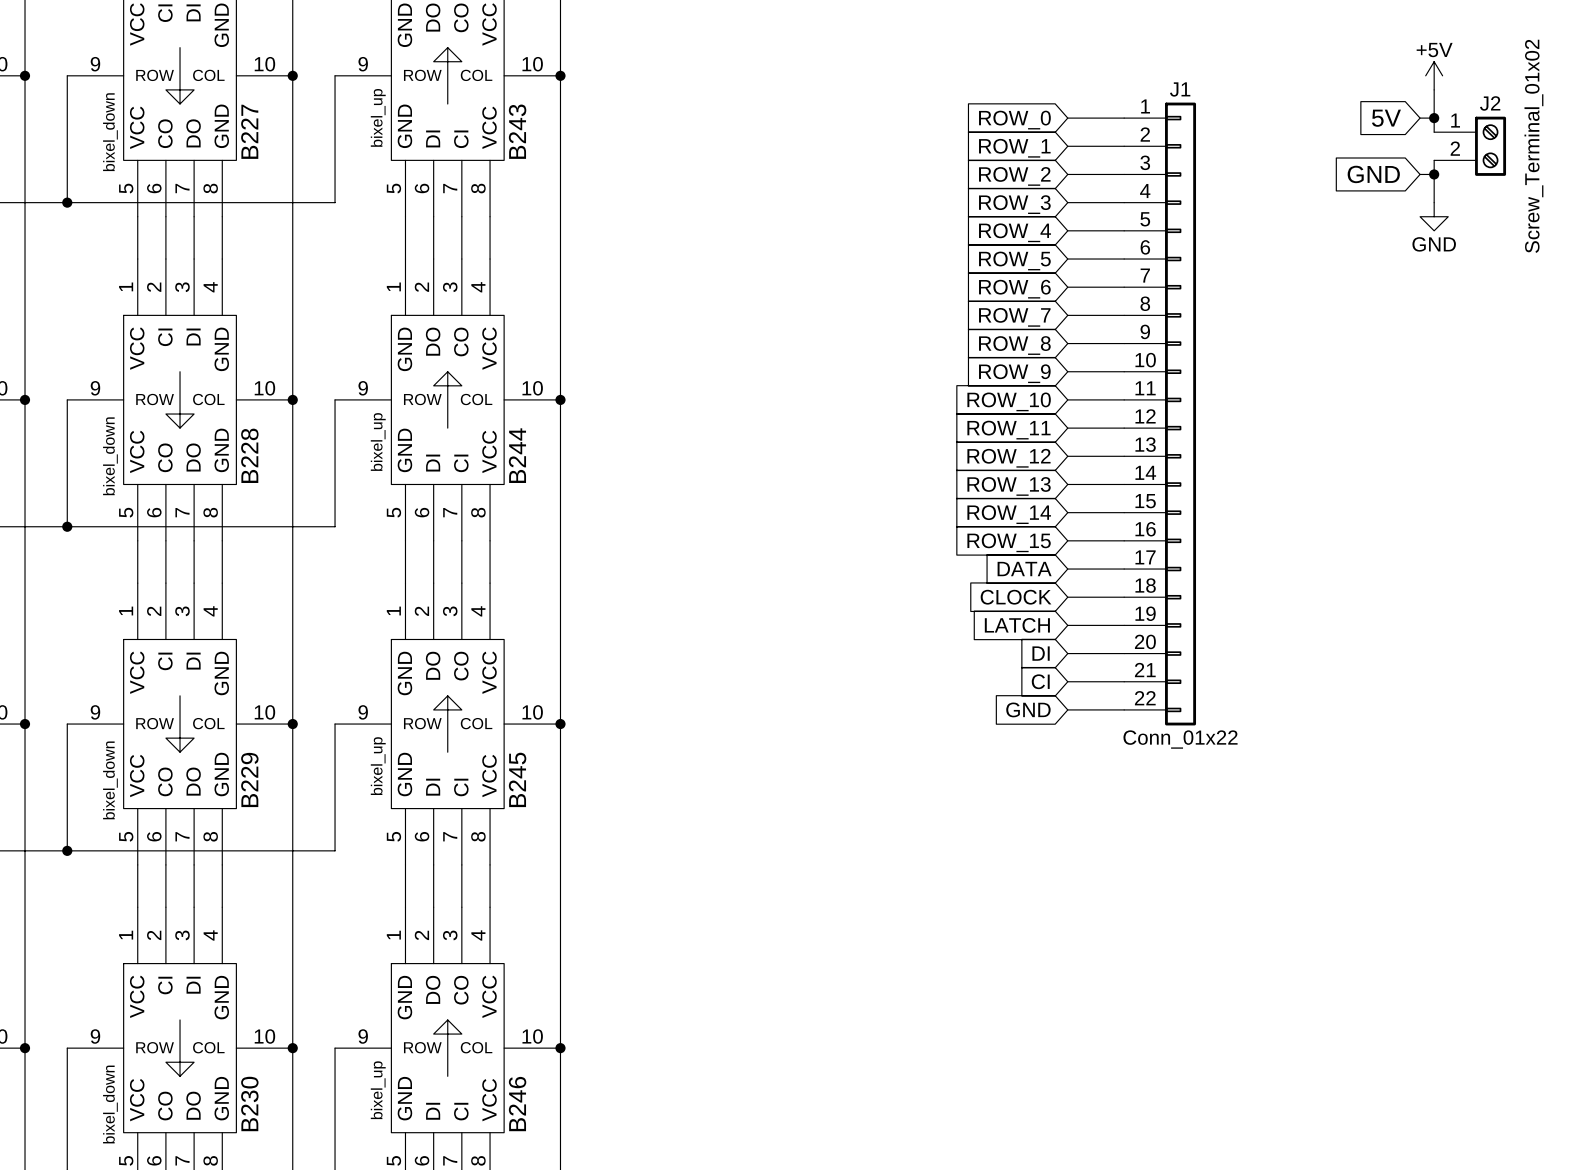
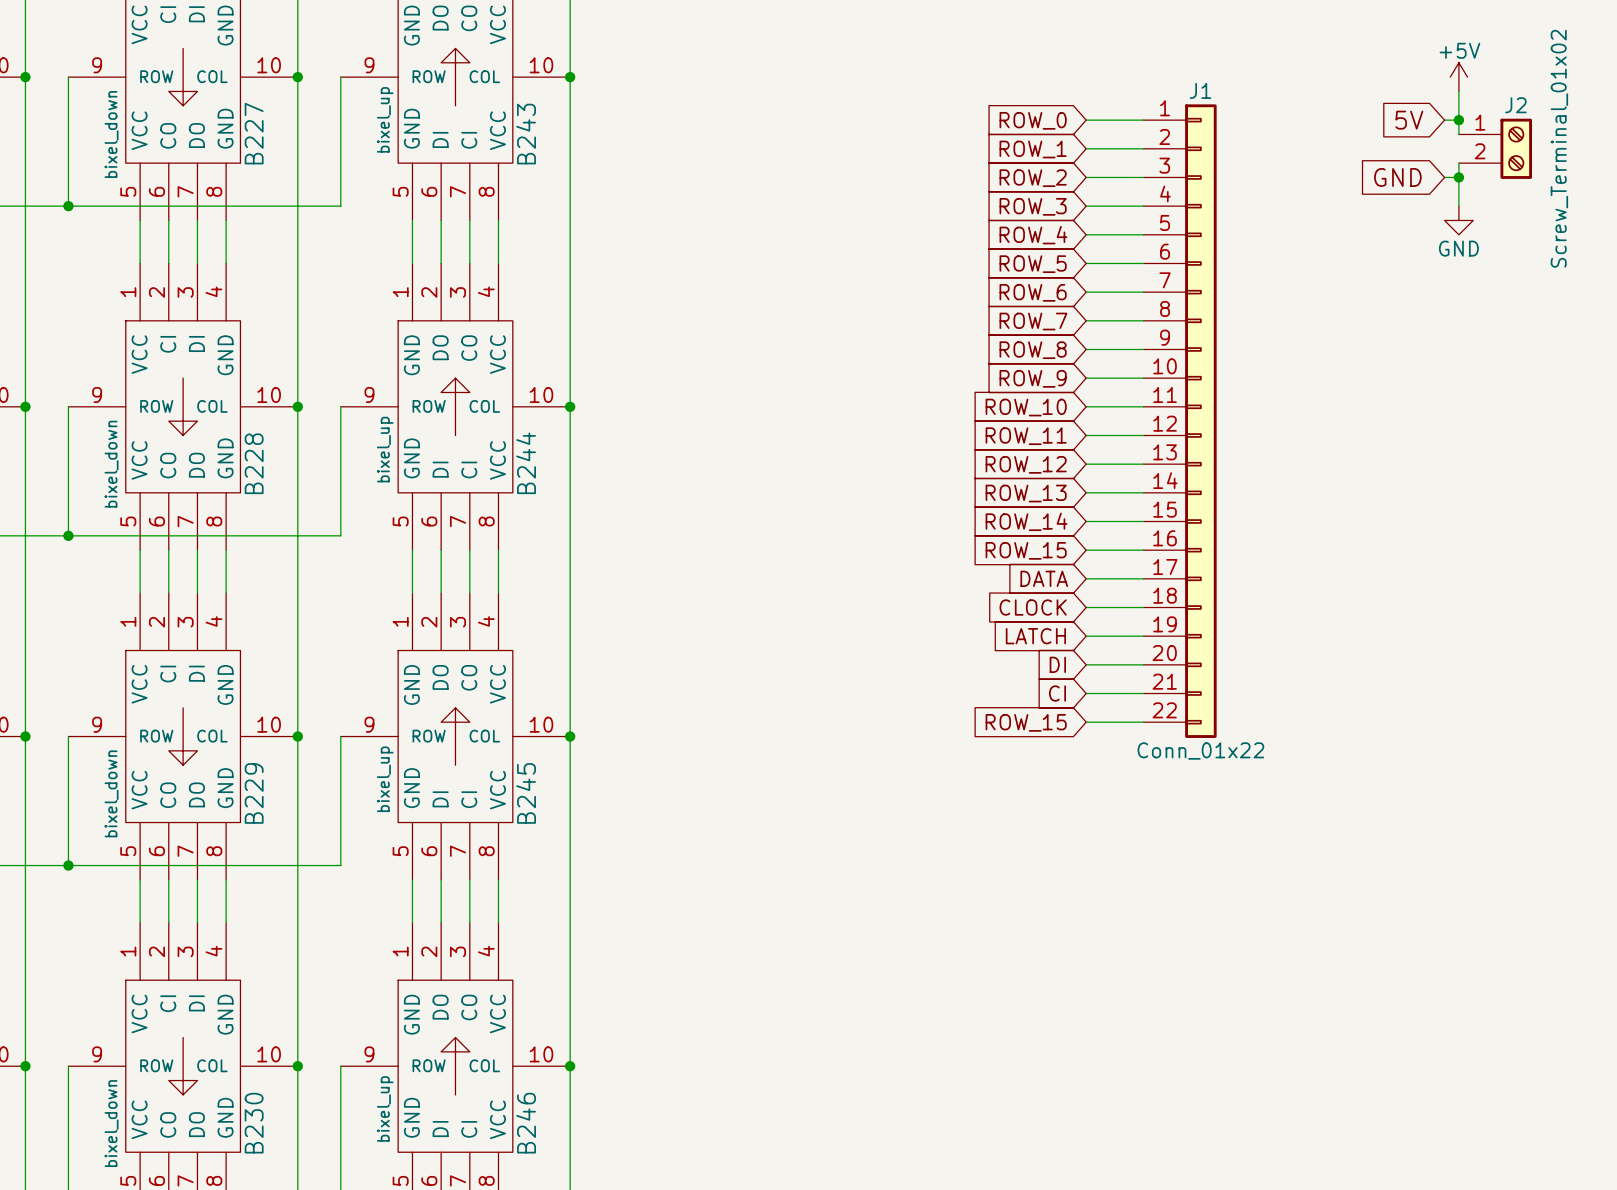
global label: GND (1028, 709) -> ROW_15 (1026, 722)

